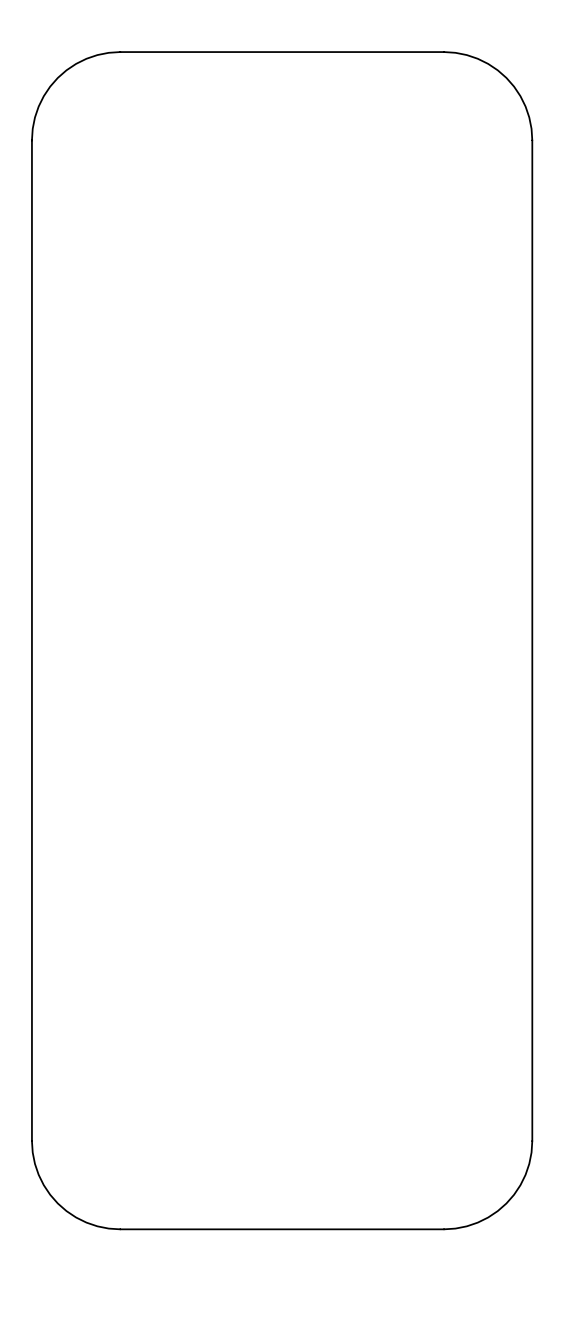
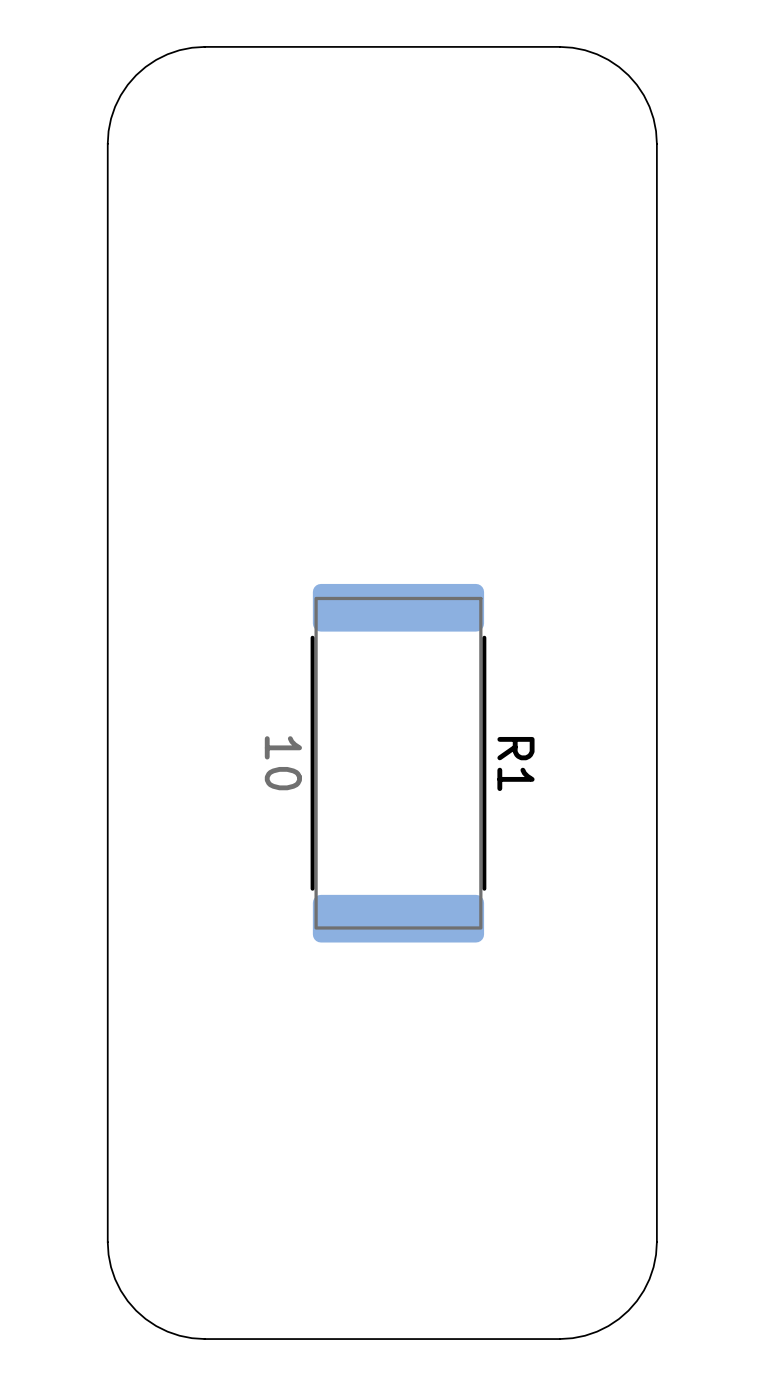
R1: none -> 10 (398, 763)

